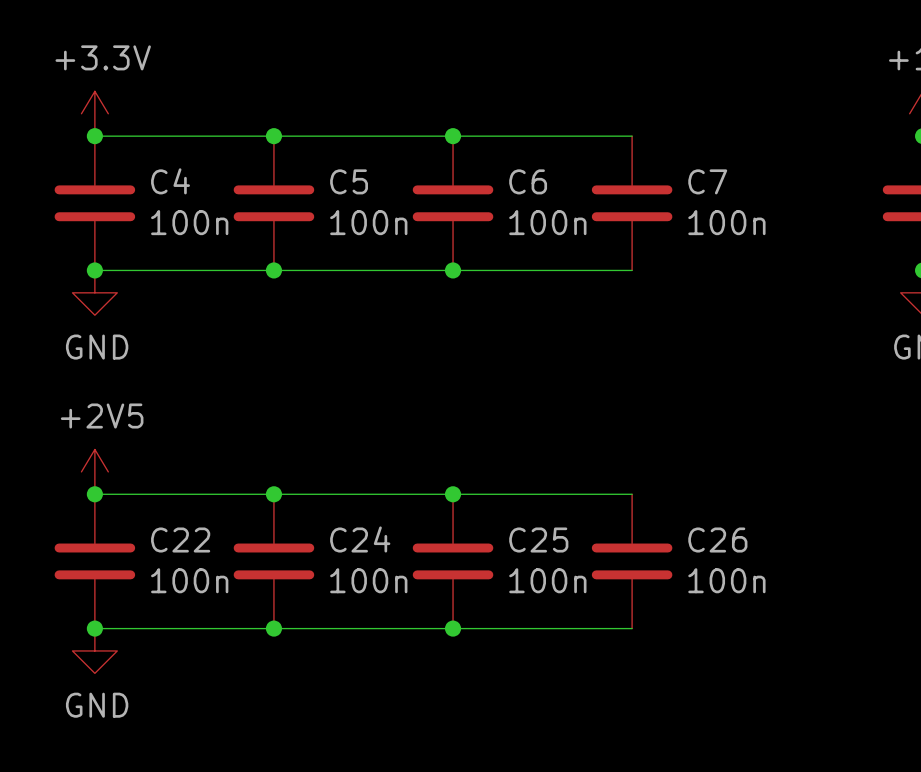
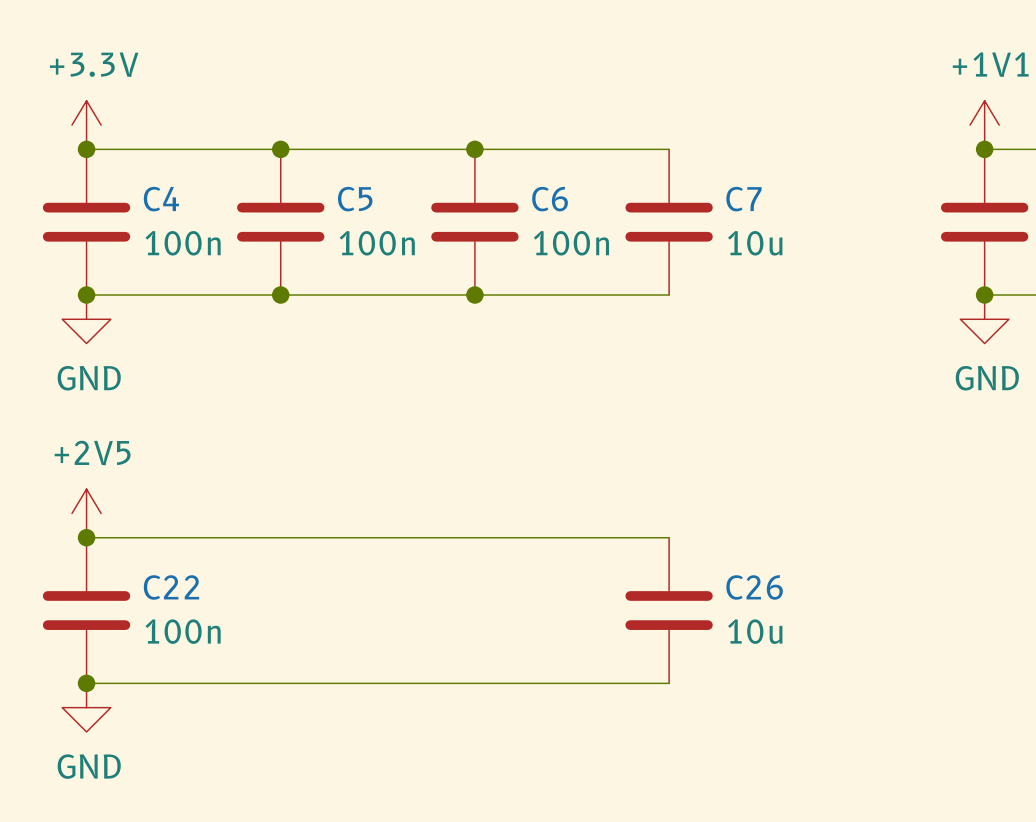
C7 value: 100n (726, 222) -> 10u (755, 243)
junction: (273, 494) -> none
junction: (453, 494) -> none
C24: 100n (273, 561) -> none
C25: 100n (453, 561) -> none
C26 value: 100n (726, 580) -> 10u (755, 631)
junction: (273, 628) -> none
junction: (453, 628) -> none

